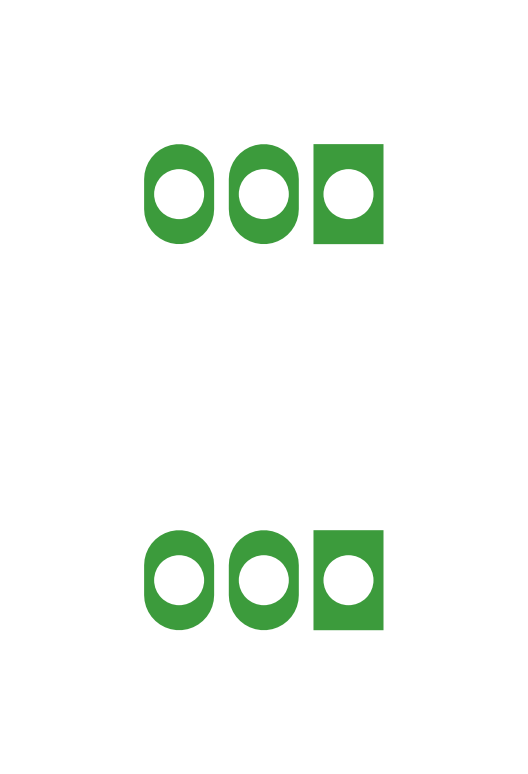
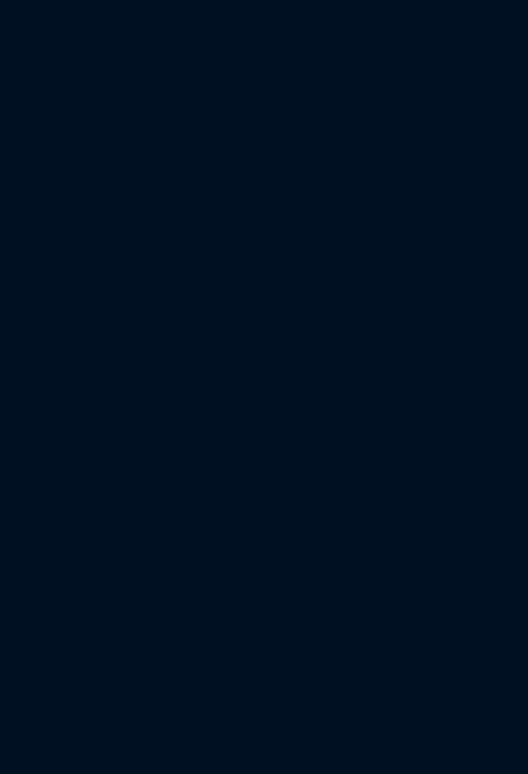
part: (263, 194) -> none
part: (263, 580) -> none

